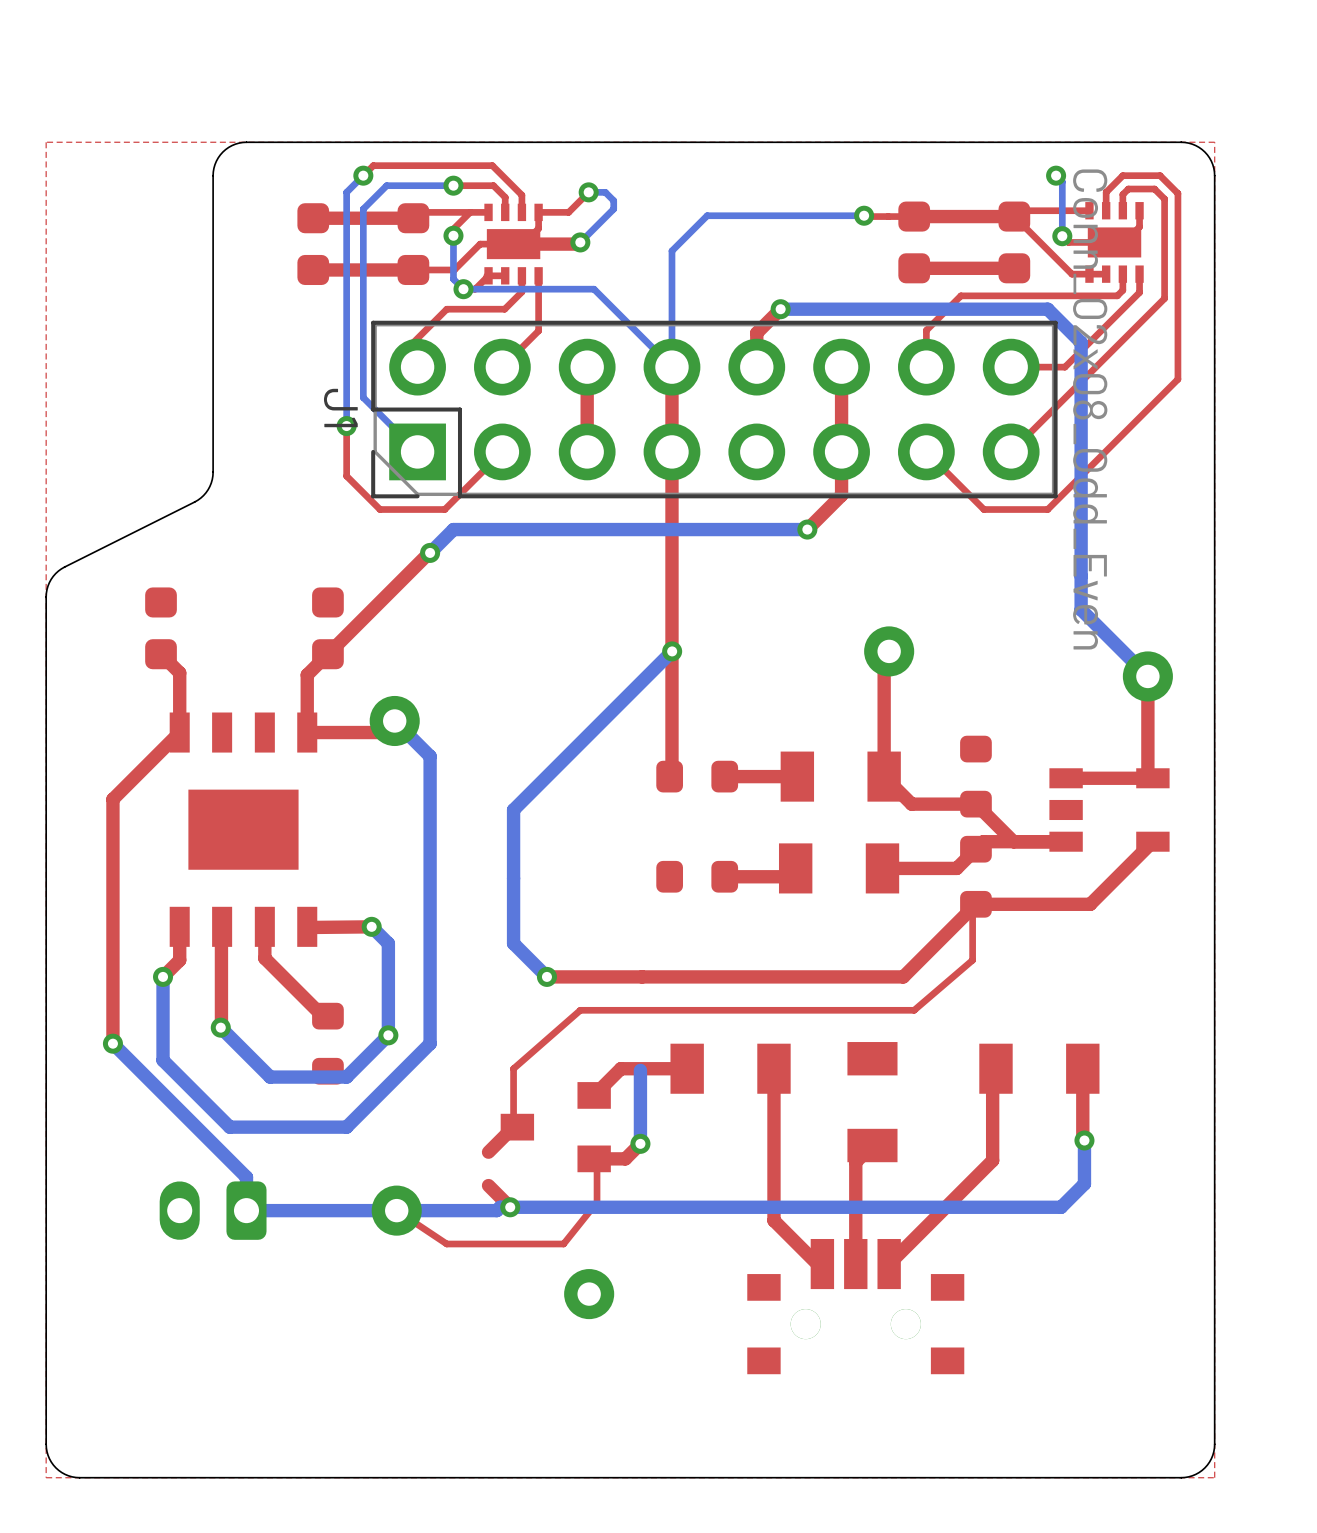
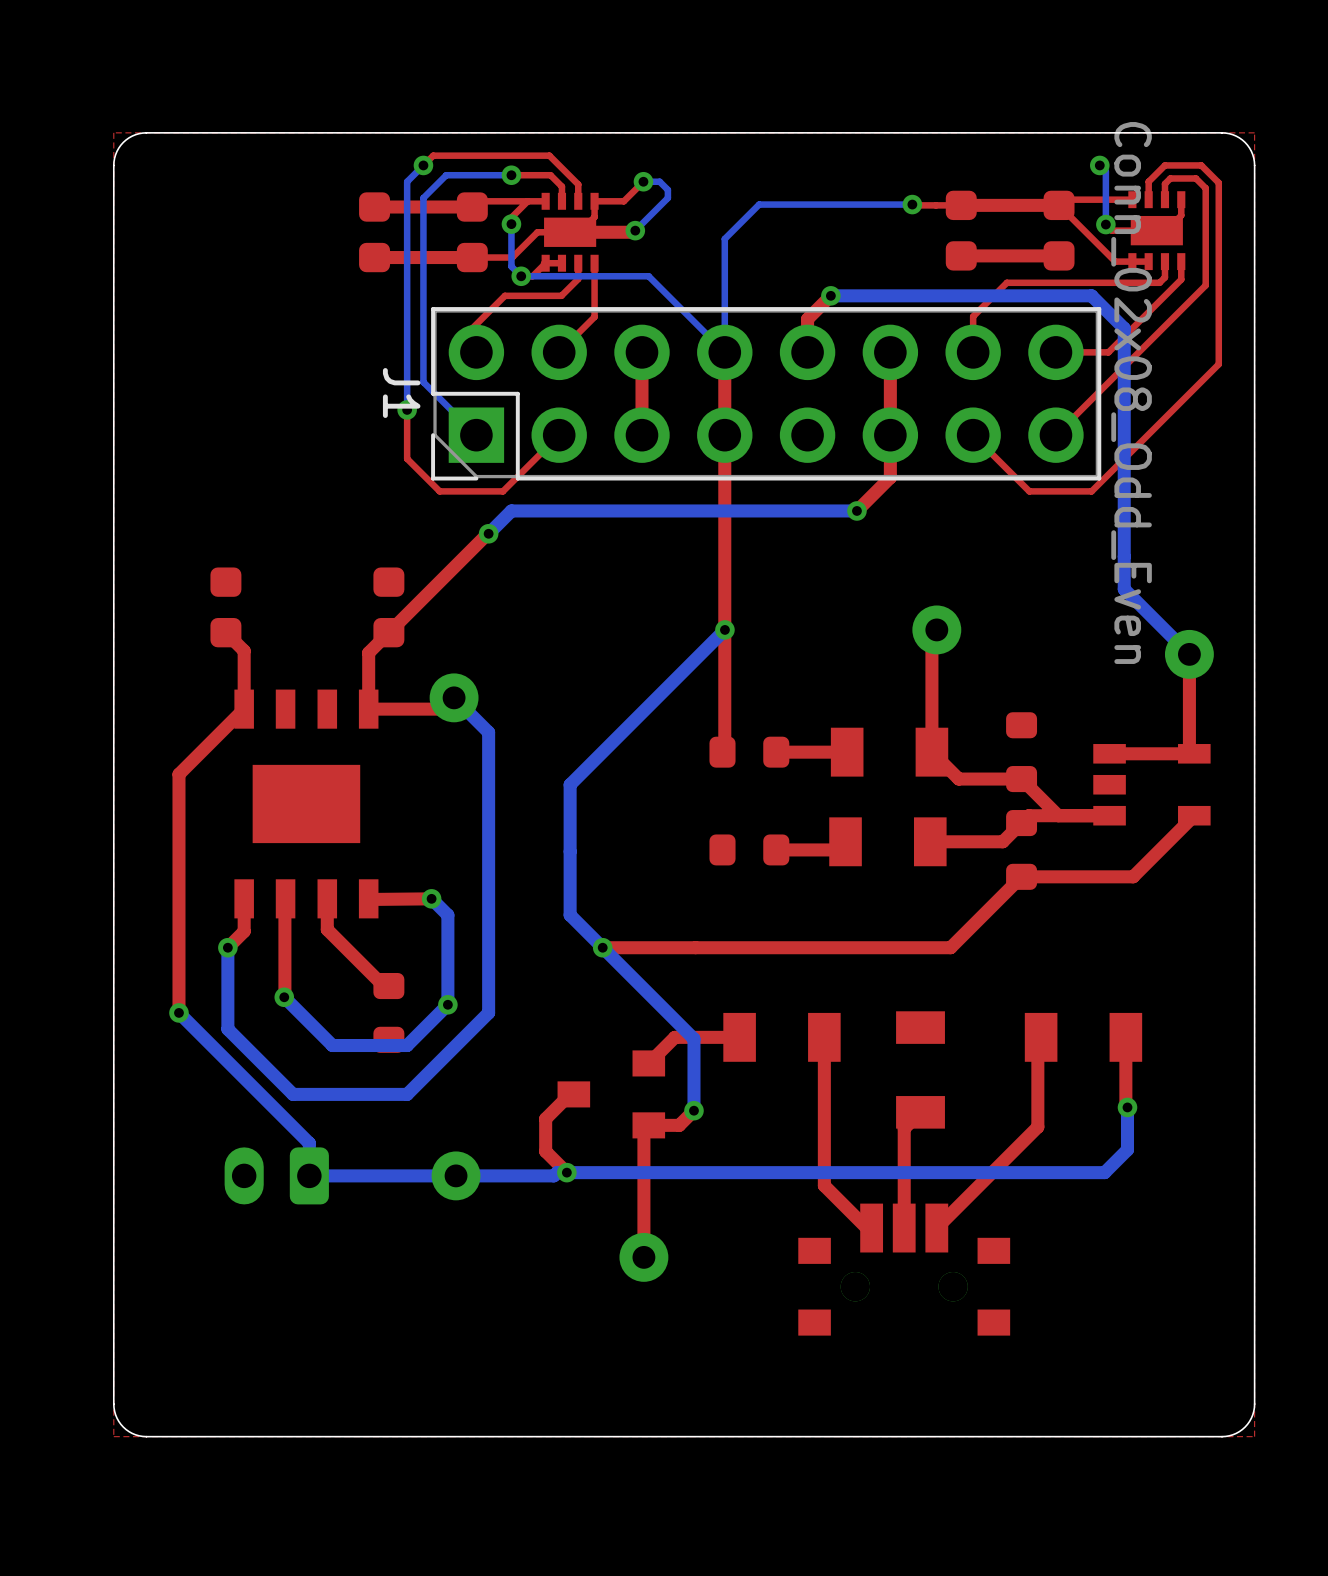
board edge: (246, 142) (232, 145) (222, 152) (216, 161) (213, 171) (213, 472) (209, 486) (203, 495) (194, 502) (61, 568) (51, 579) (46, 596) -> (309, 132) (142, 133) (129, 137) (117, 151) (113, 165) (113, 576)
top track: (972, 910) (972, 960) (914, 1010) (580, 1010) (513, 1068) (513, 1127) -> none
bottom track: none -> (602, 947) (693, 1038)
top track: none -> (545, 1118) (545, 1151)
top track: (597, 1160) (597, 1202) (563, 1244) (446, 1244) (396, 1210) -> none
top track: none -> (643, 1130) (643, 1257)

